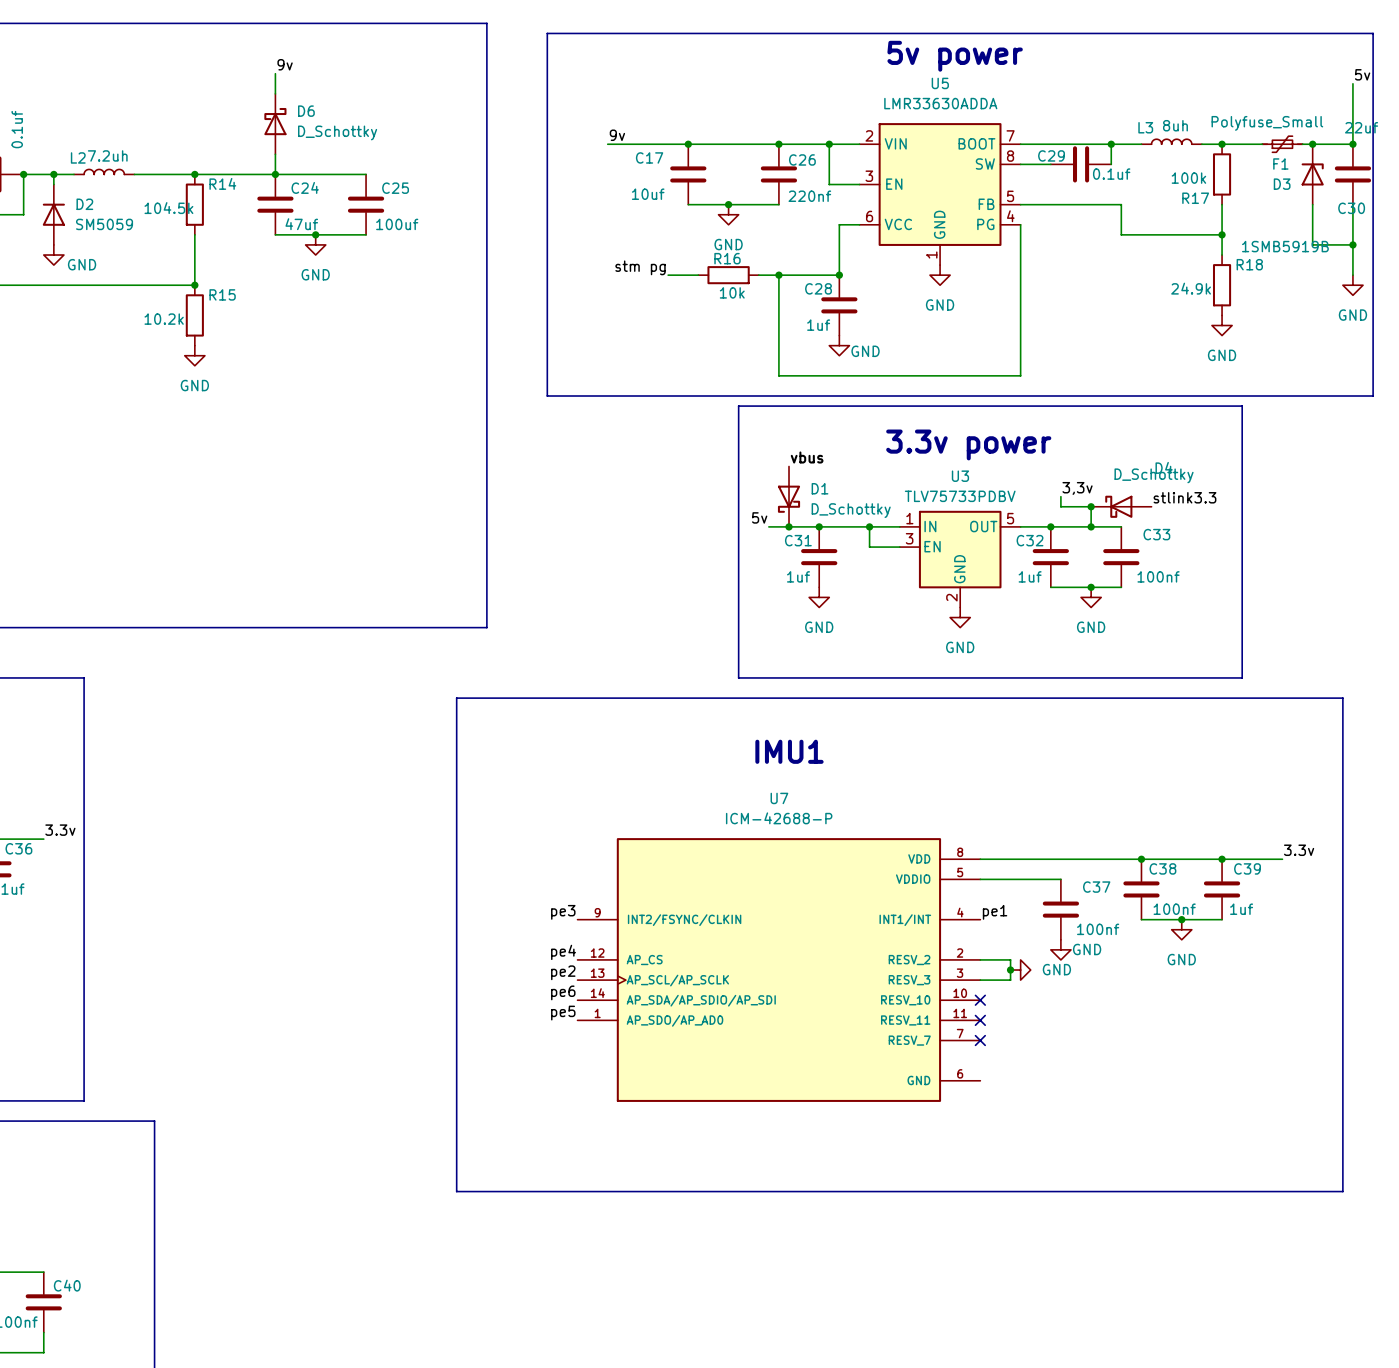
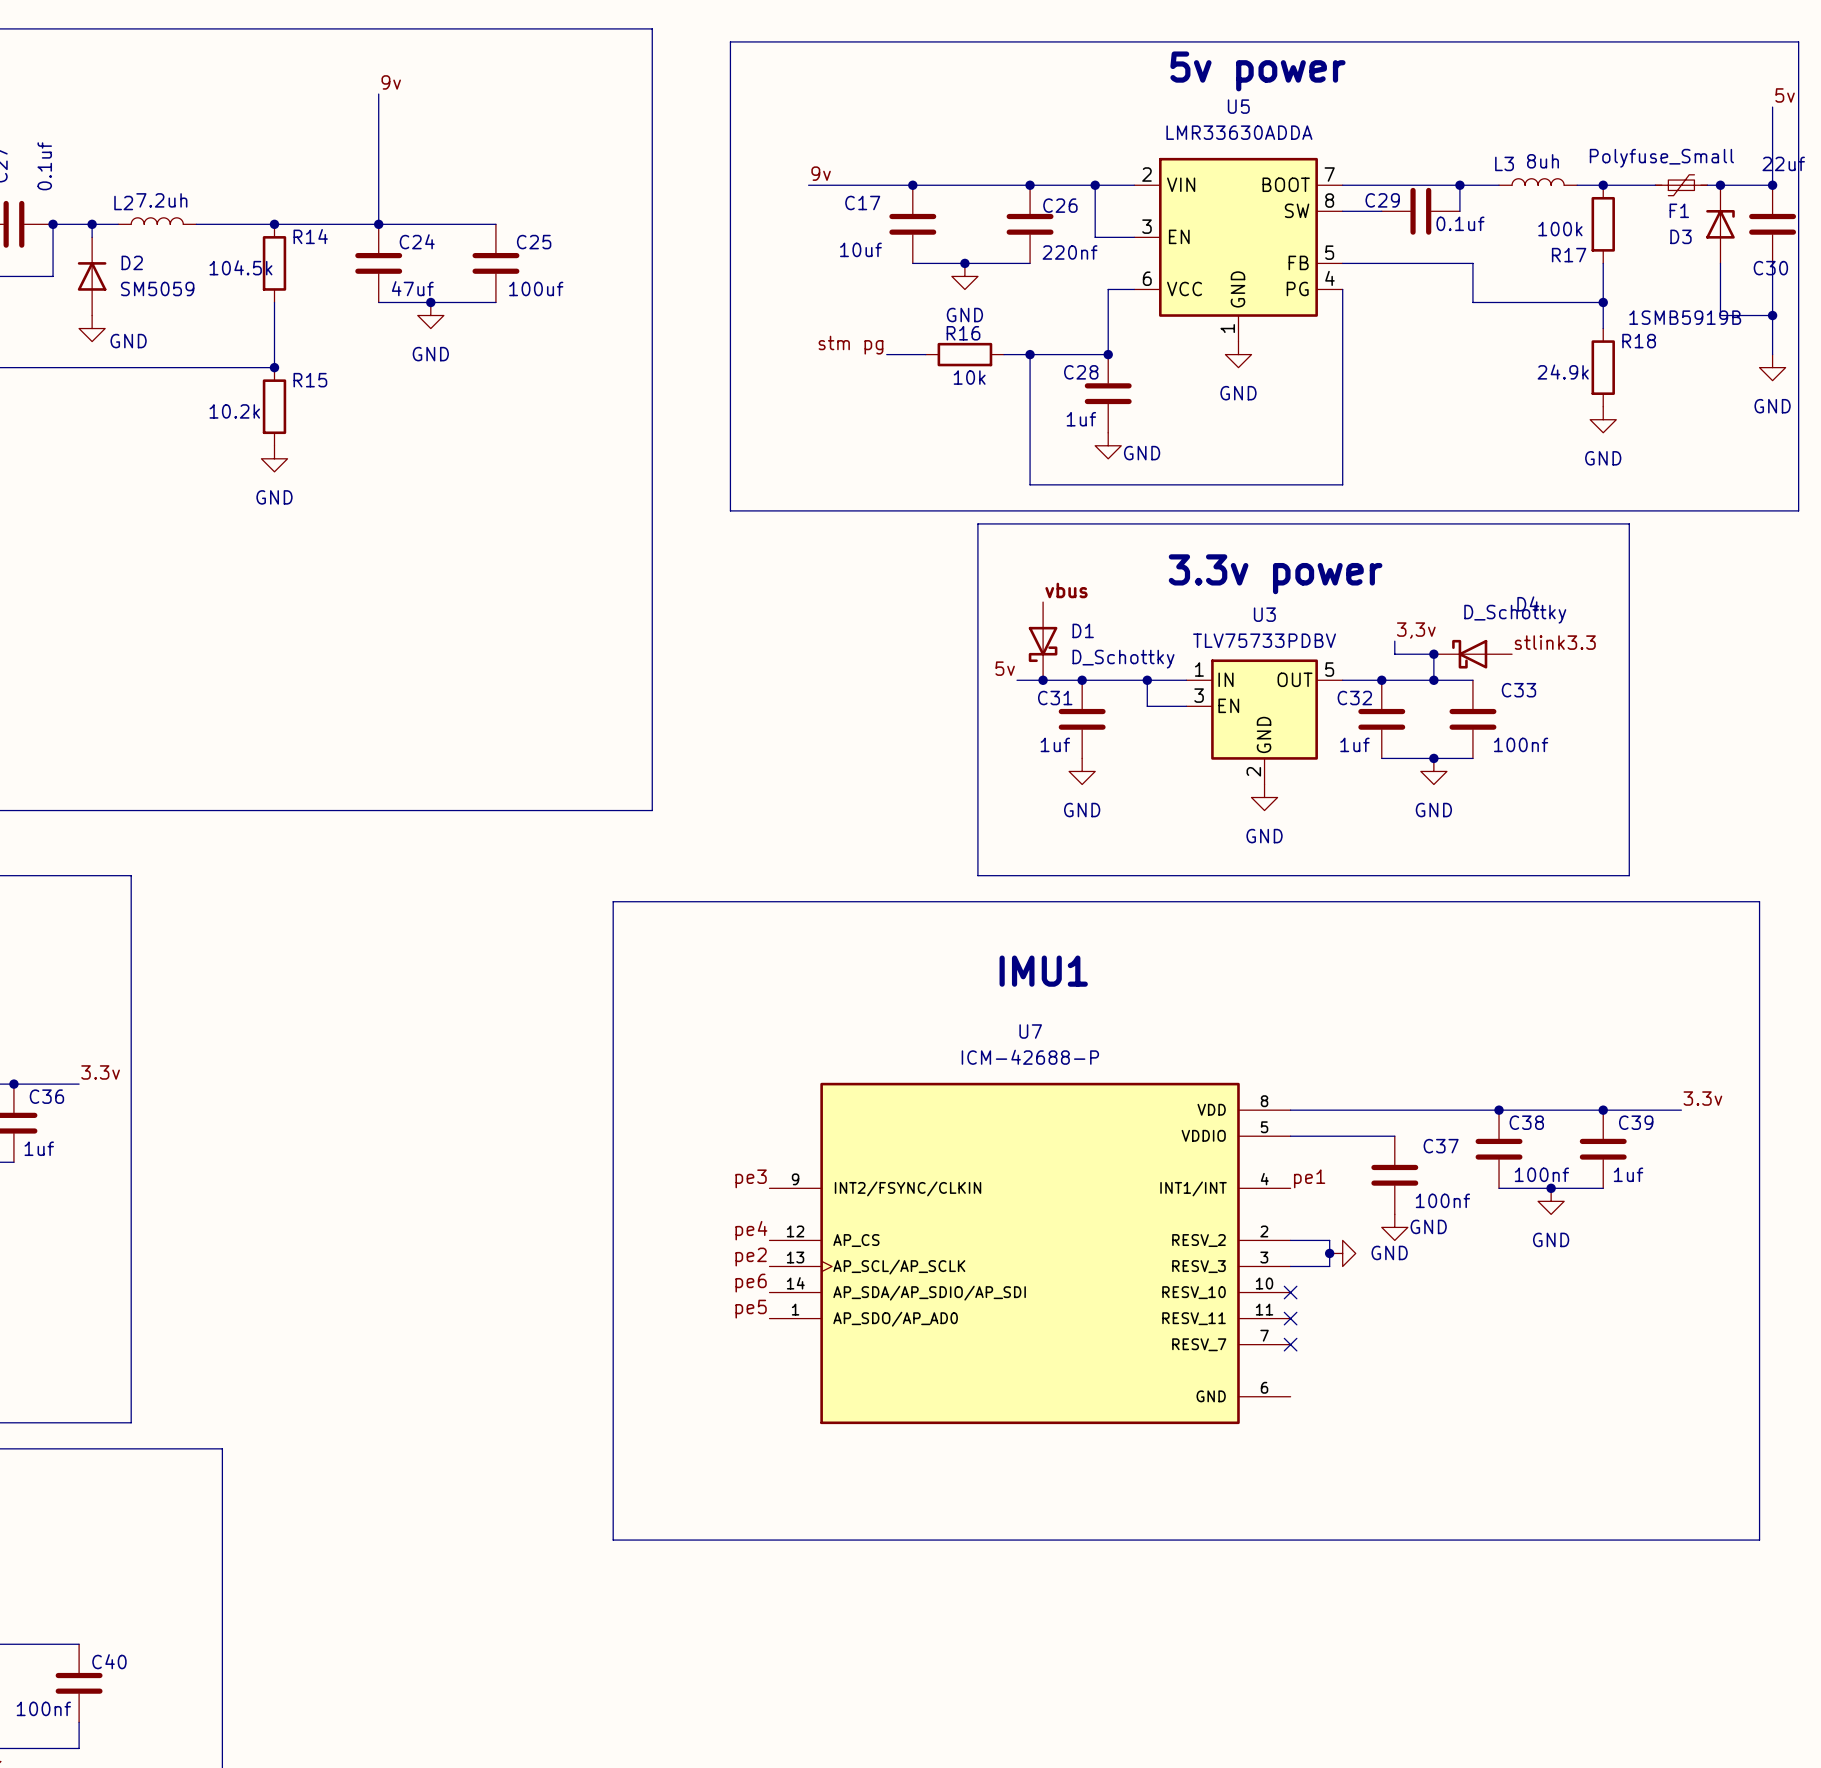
D6: D_Schottky (275, 124) -> none

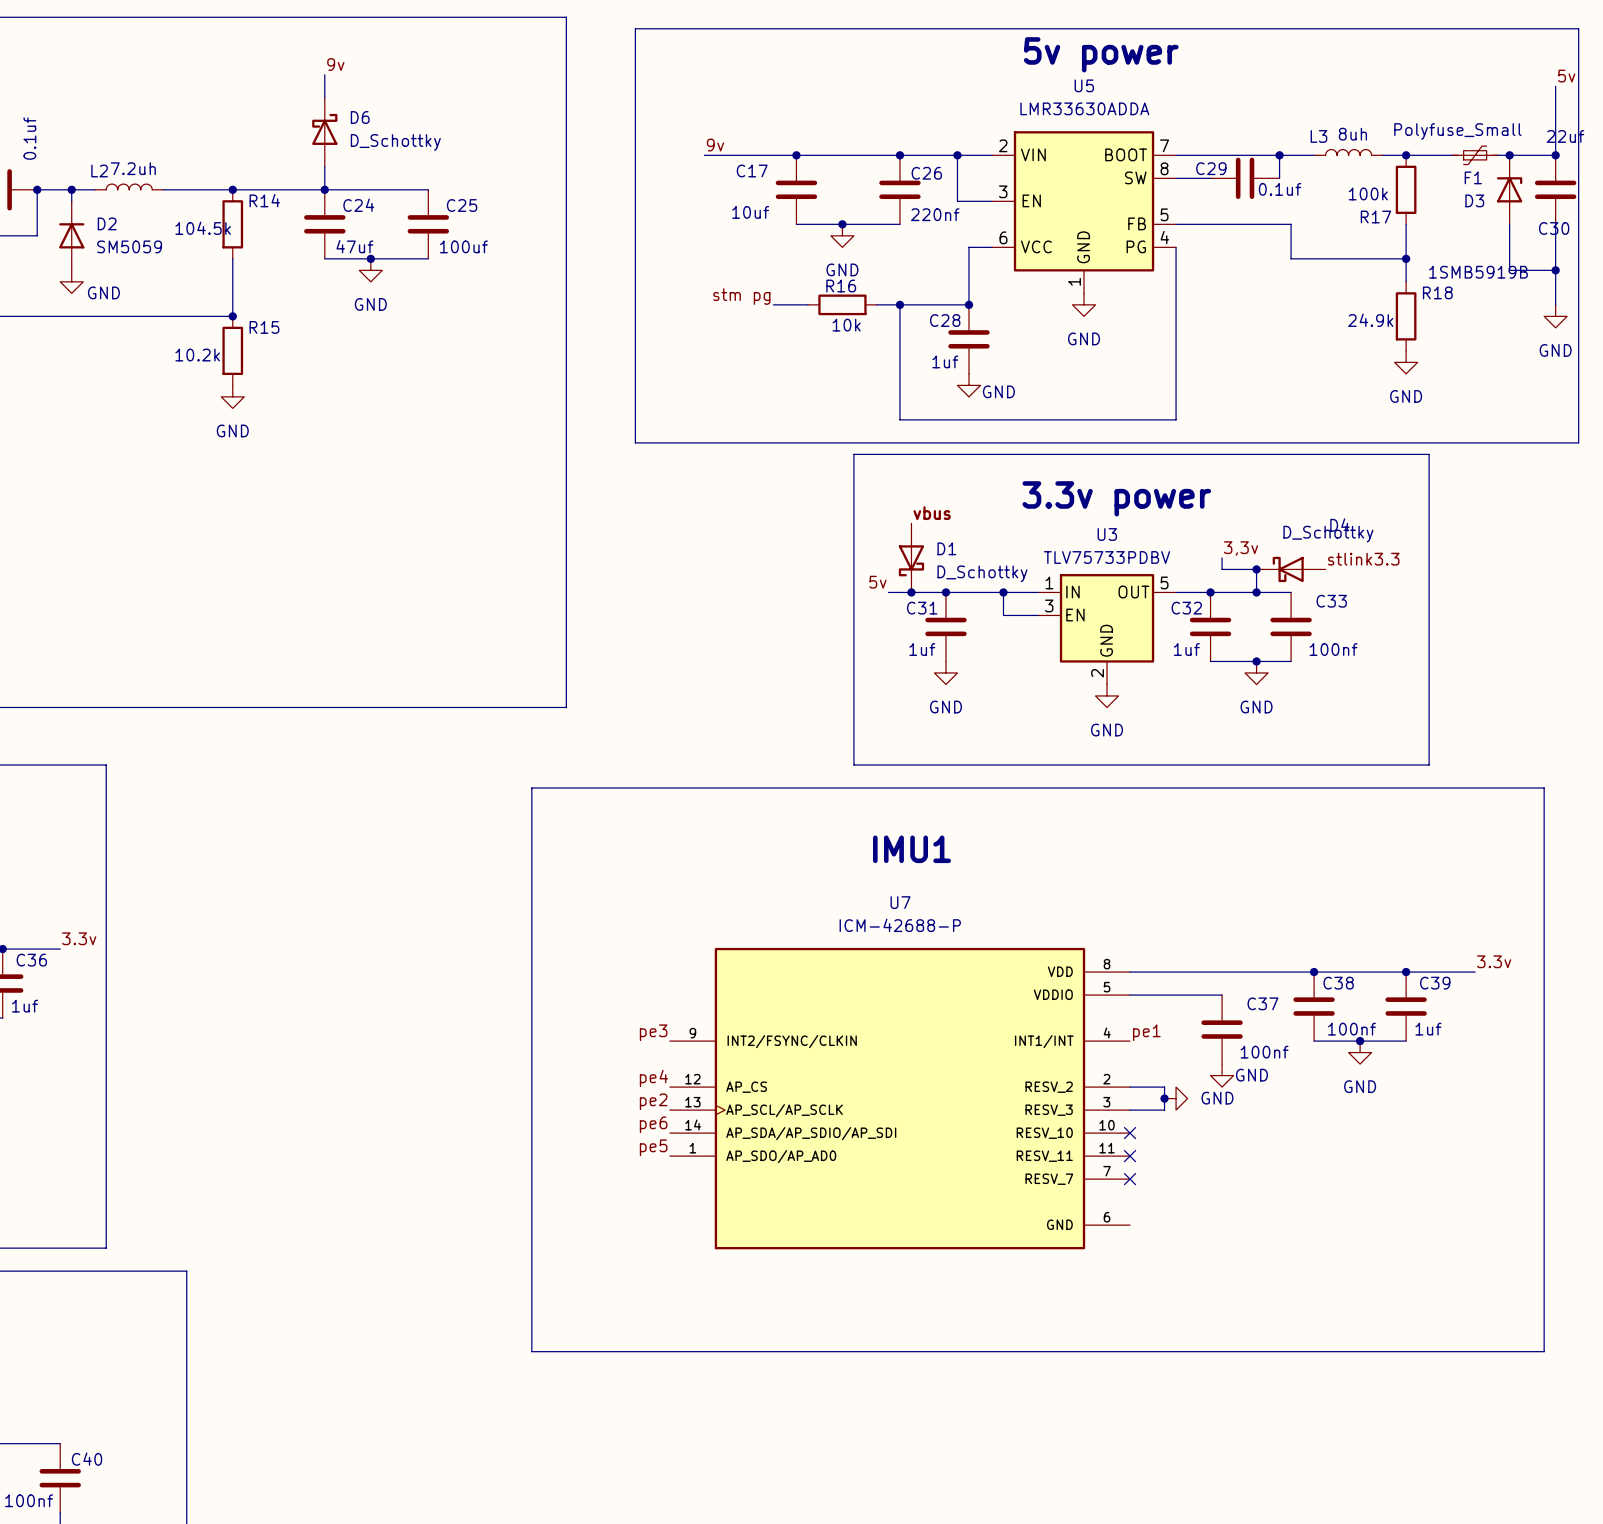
D6: none -> D_Schottky (324, 132)

